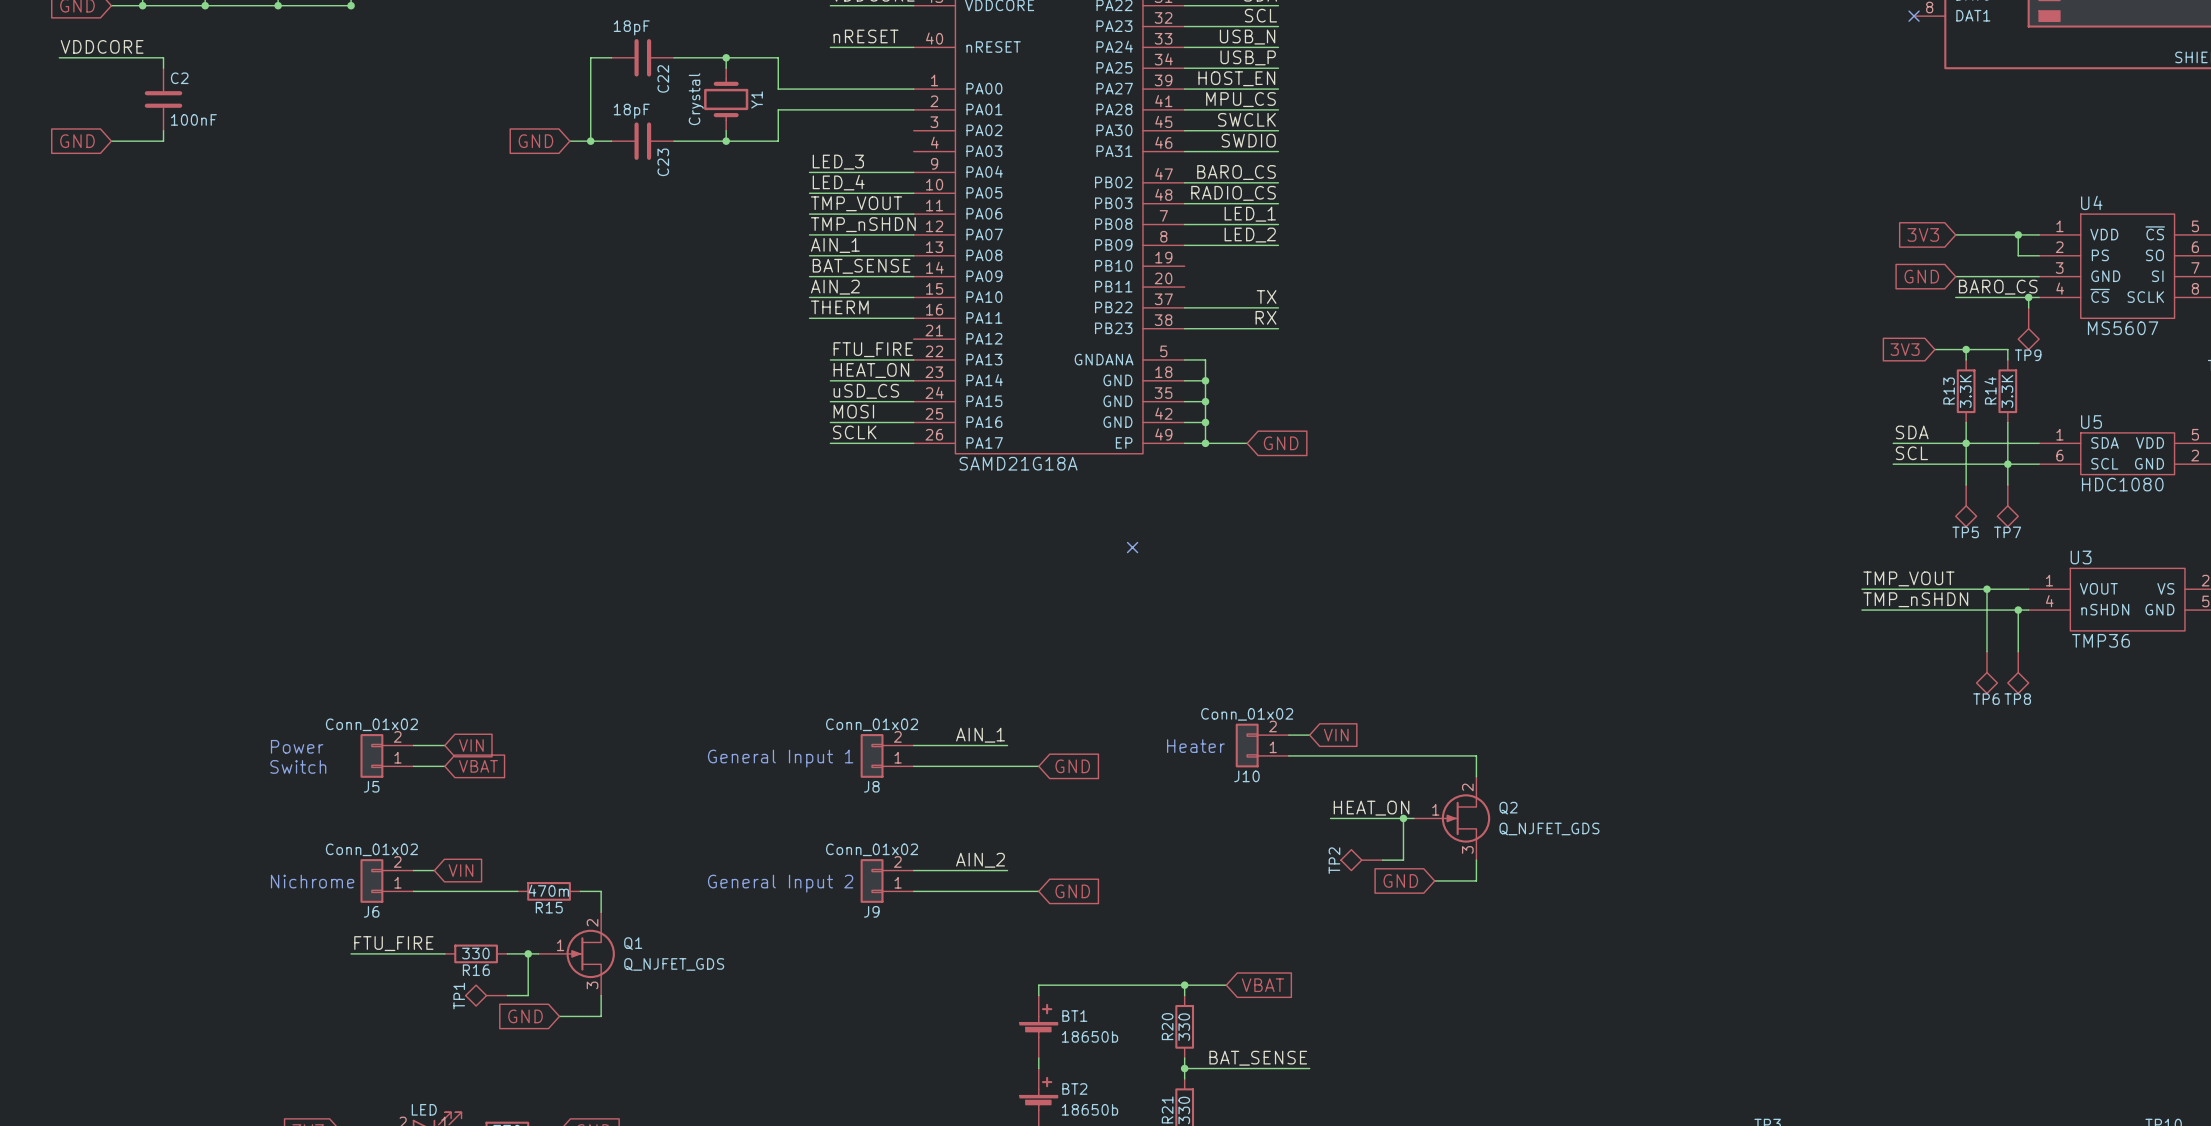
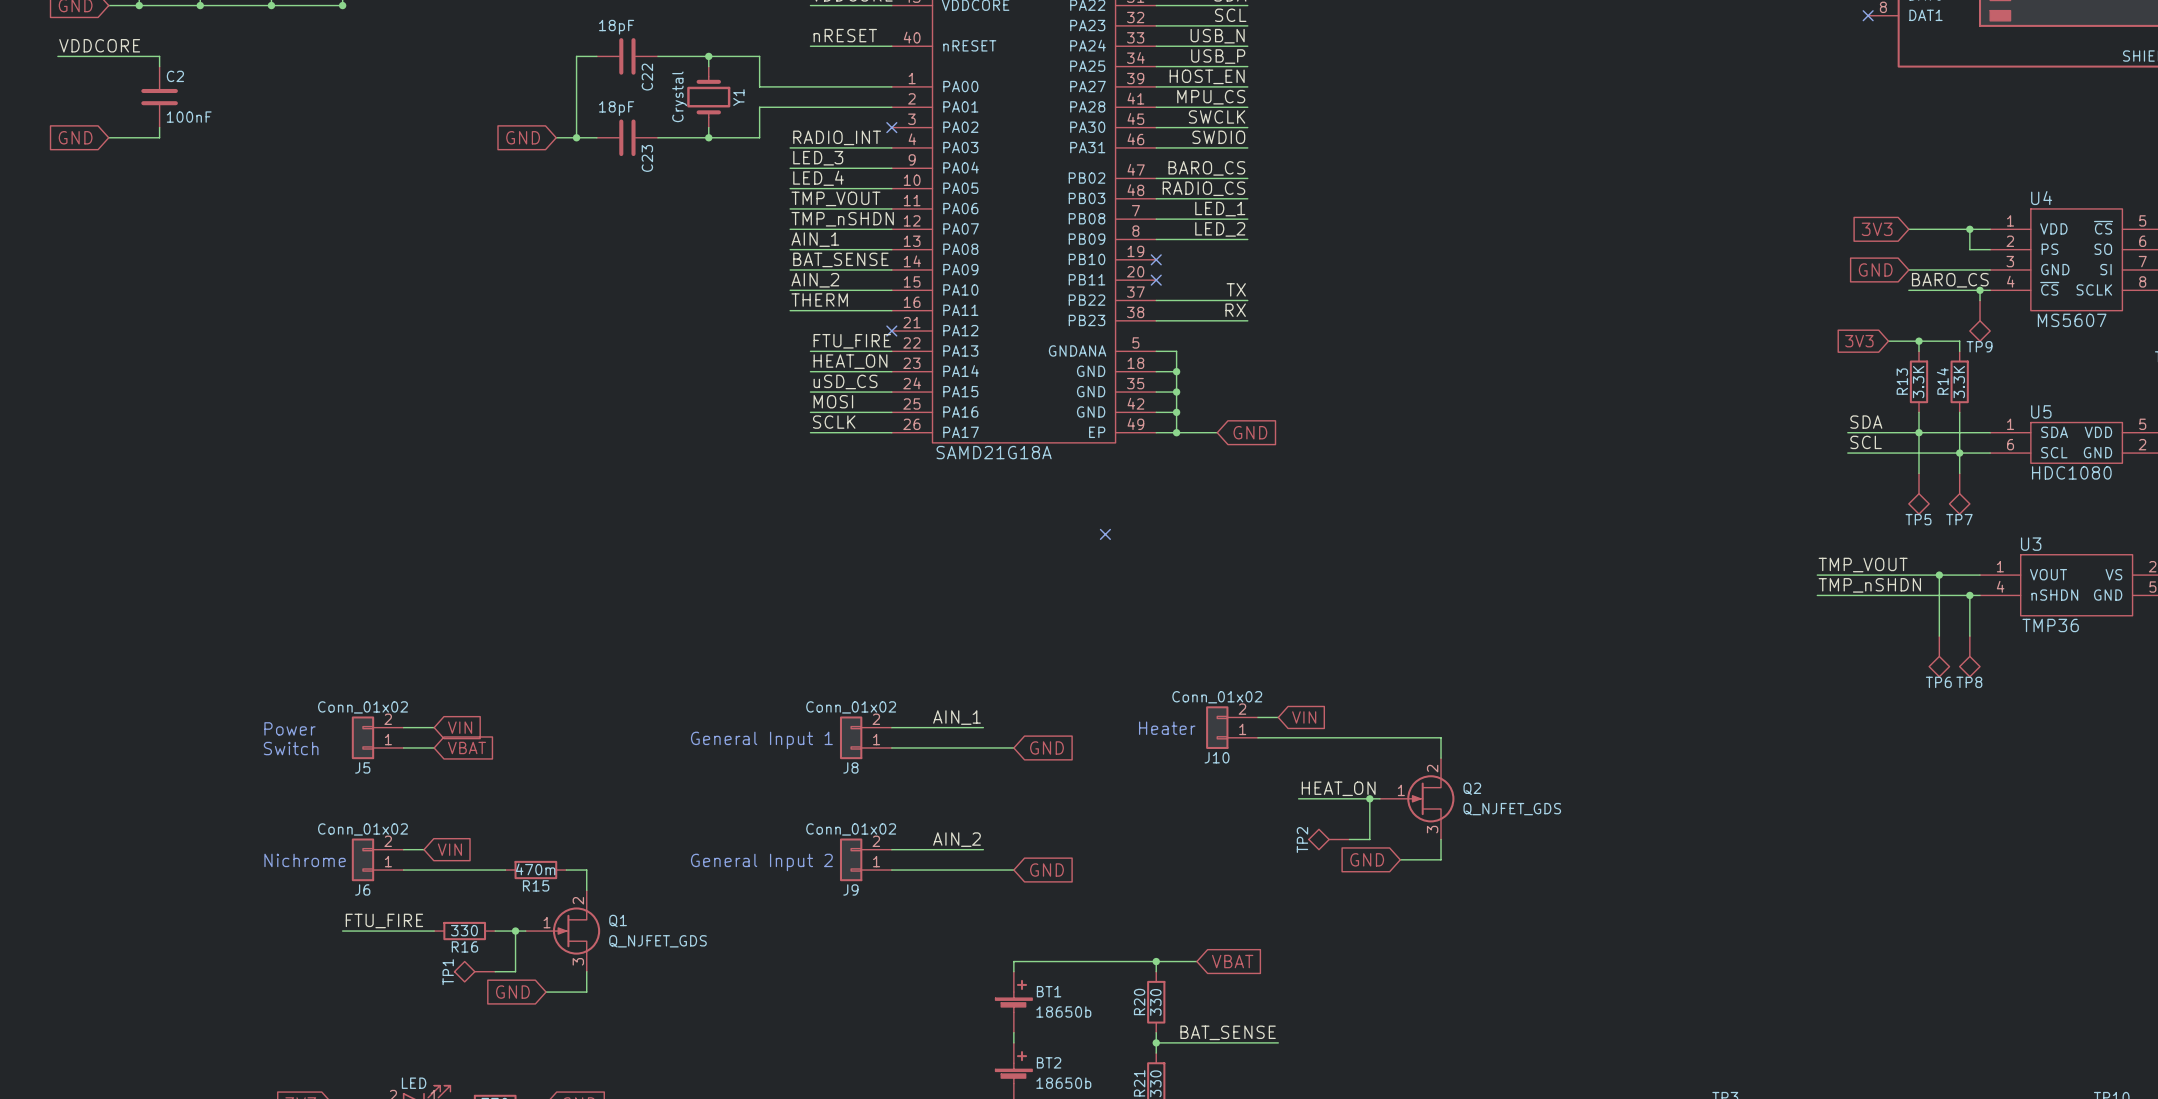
no-connect mark: none -> (891, 127)
label: none -> RADIO_INT (837, 137)
wire: none -> (790, 147) (891, 147)
no-connect mark: none -> (1156, 259)
no-connect mark: none -> (1156, 280)
no-connect mark: none -> (891, 331)

